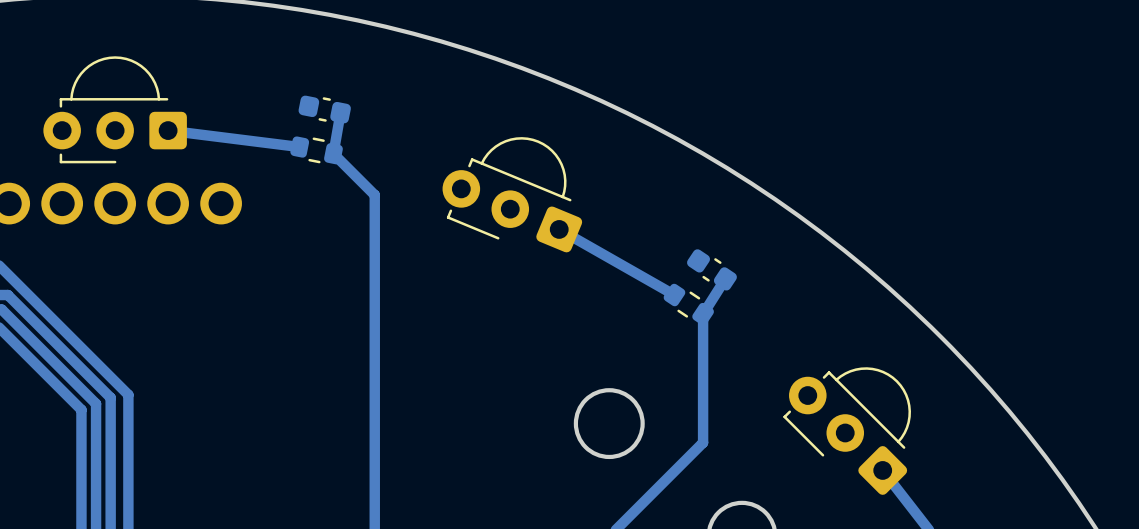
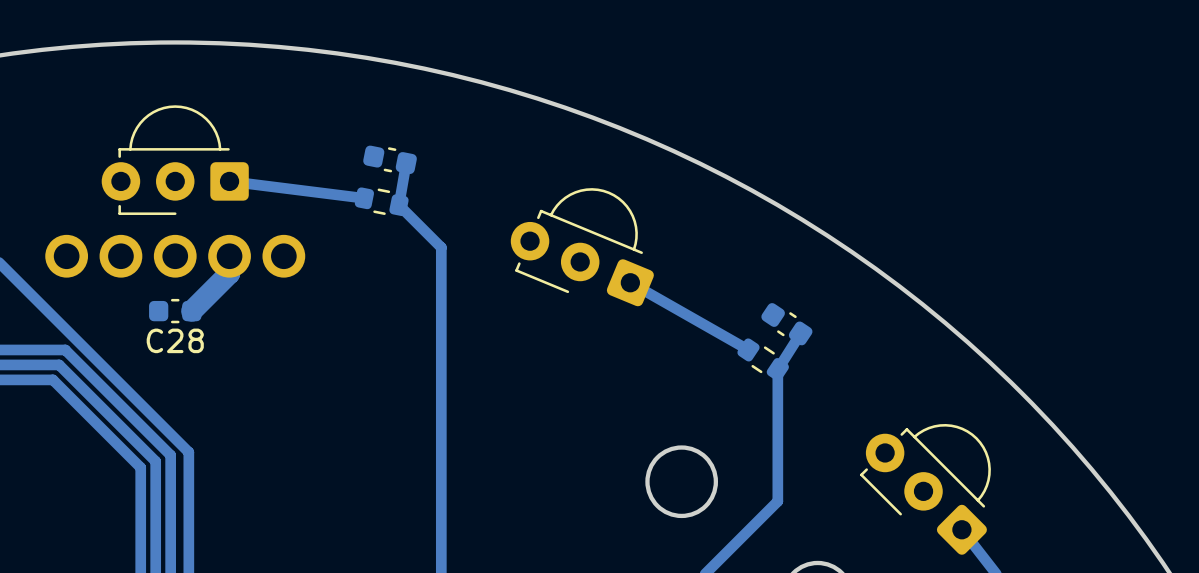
track: none -> (229, 256) (229, 273) (191, 311)
C28: none -> (175, 311)

